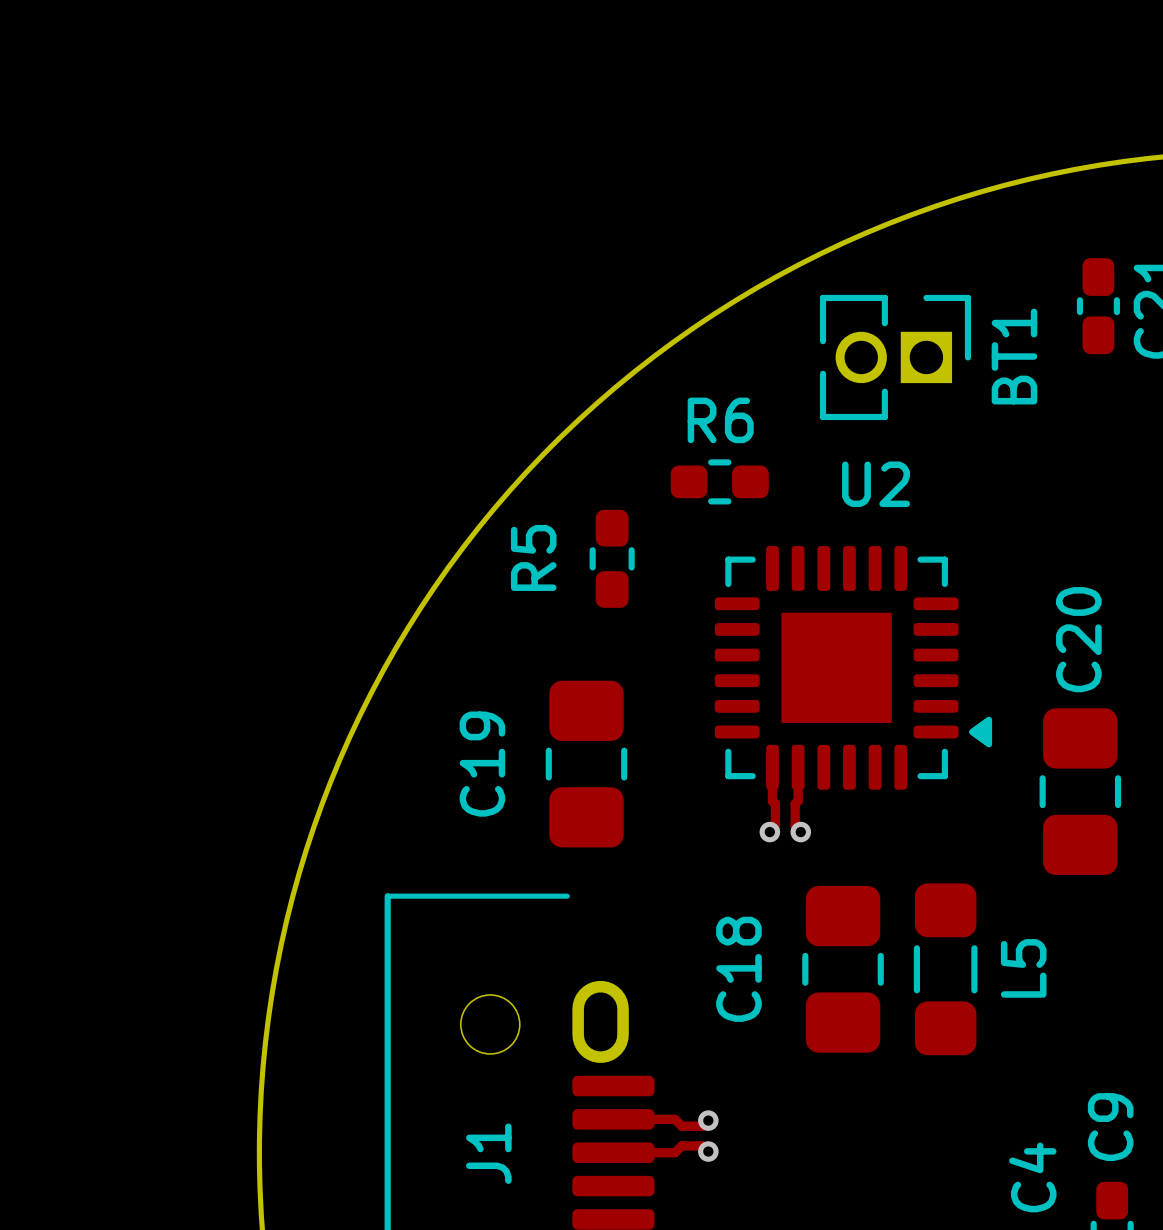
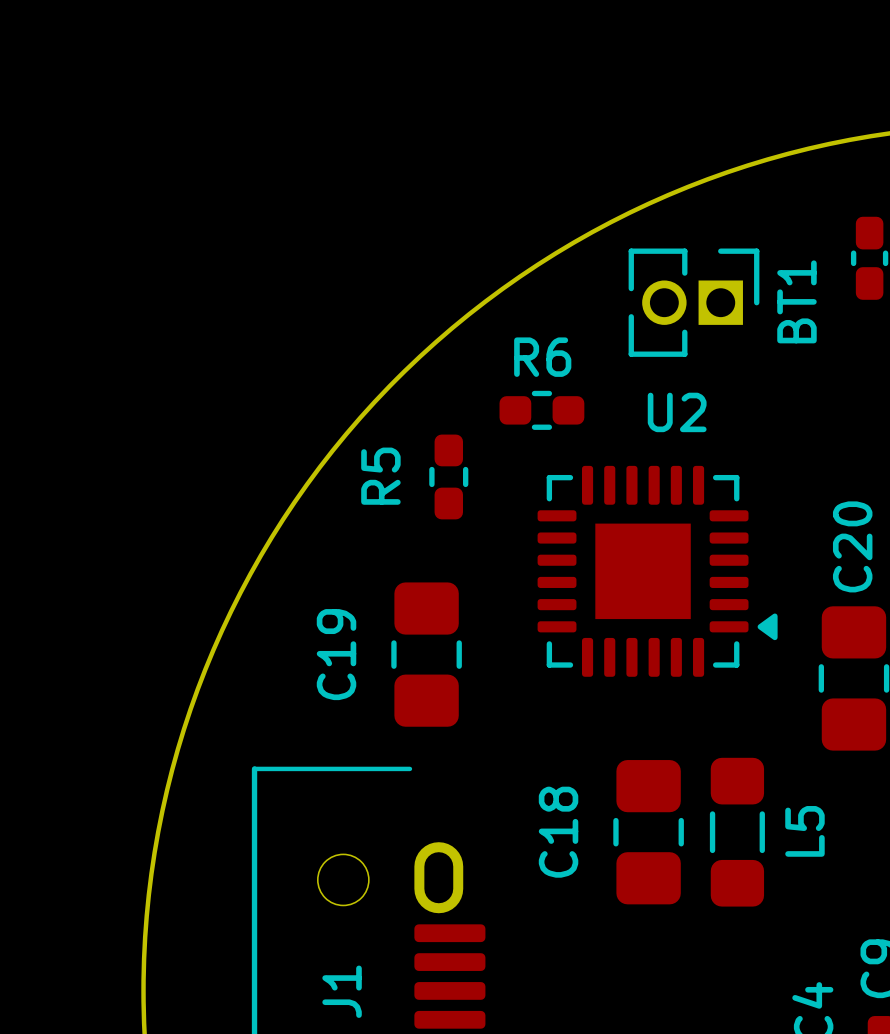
track: (772, 767) (772, 800) (775, 803) (775, 826) (769, 832) -> none
track: (798, 767) (798, 800) (795, 803) (795, 826) (800, 832) -> none
via: (769, 832) -> none
via: (800, 832) -> none
track: (613, 1119) (675, 1119) (681, 1126) (702, 1126) (708, 1120) -> none
via: (708, 1120) -> none
track: (708, 1151) (702, 1145) (681, 1145) (675, 1152) (613, 1152) -> none
via: (708, 1151) -> none

